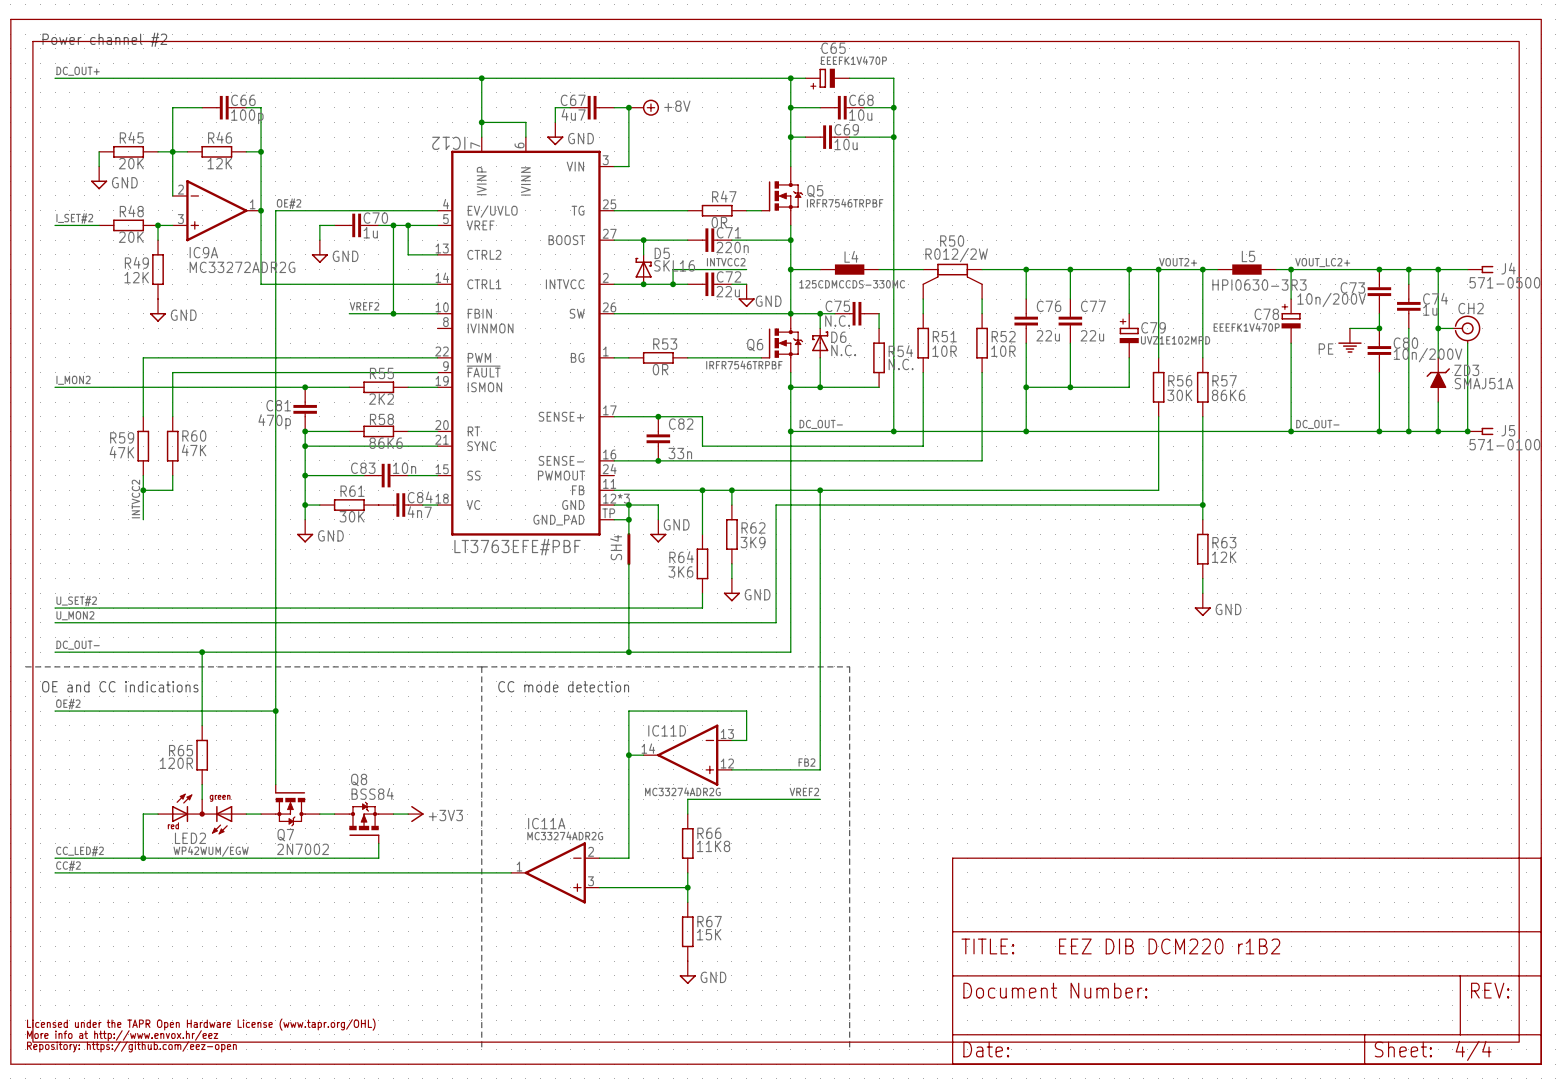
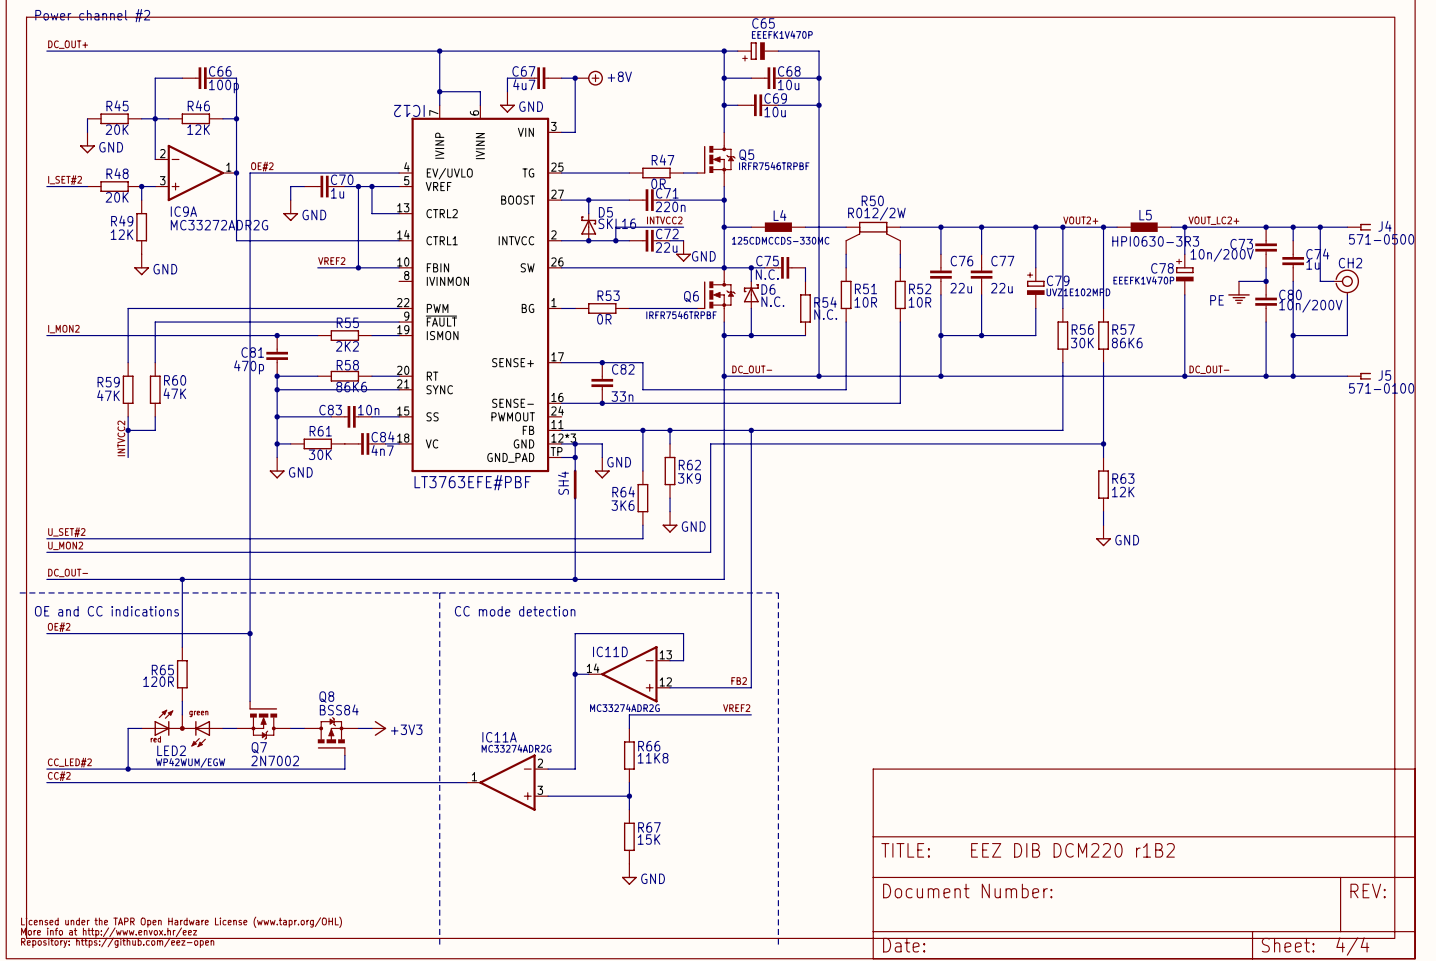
wire: (1438, 328) (1438, 357) -> none
junction: (1438, 328) -> none
ZD3: SMAJ51A (1438, 379) -> none
junction: none -> (1293, 335)
wire: (1467, 387) (1467, 431) -> (1347, 335) (1293, 335)
wire: (1438, 402) (1438, 431) -> none
junction: (1438, 431) -> none
junction: (1467, 431) -> none

